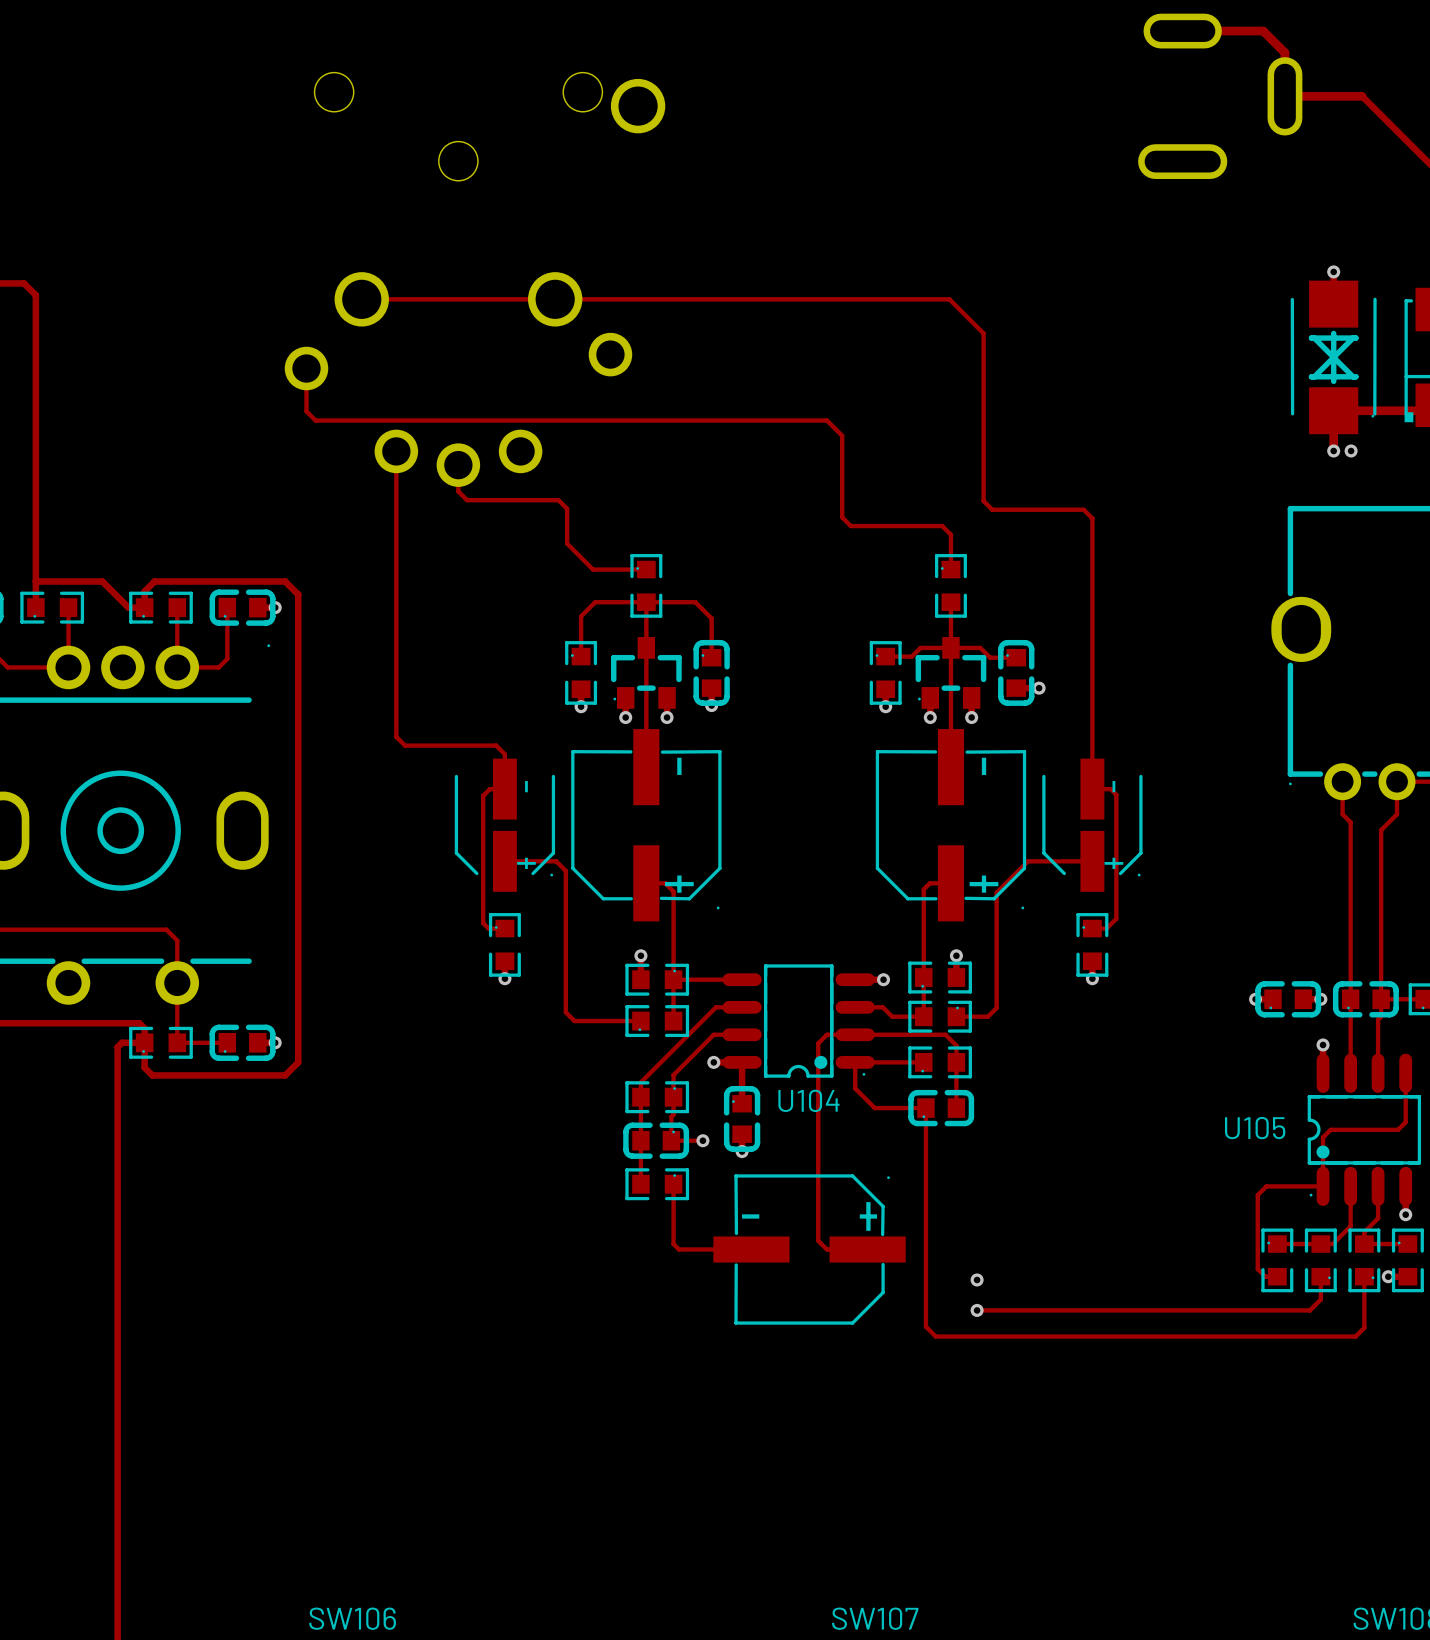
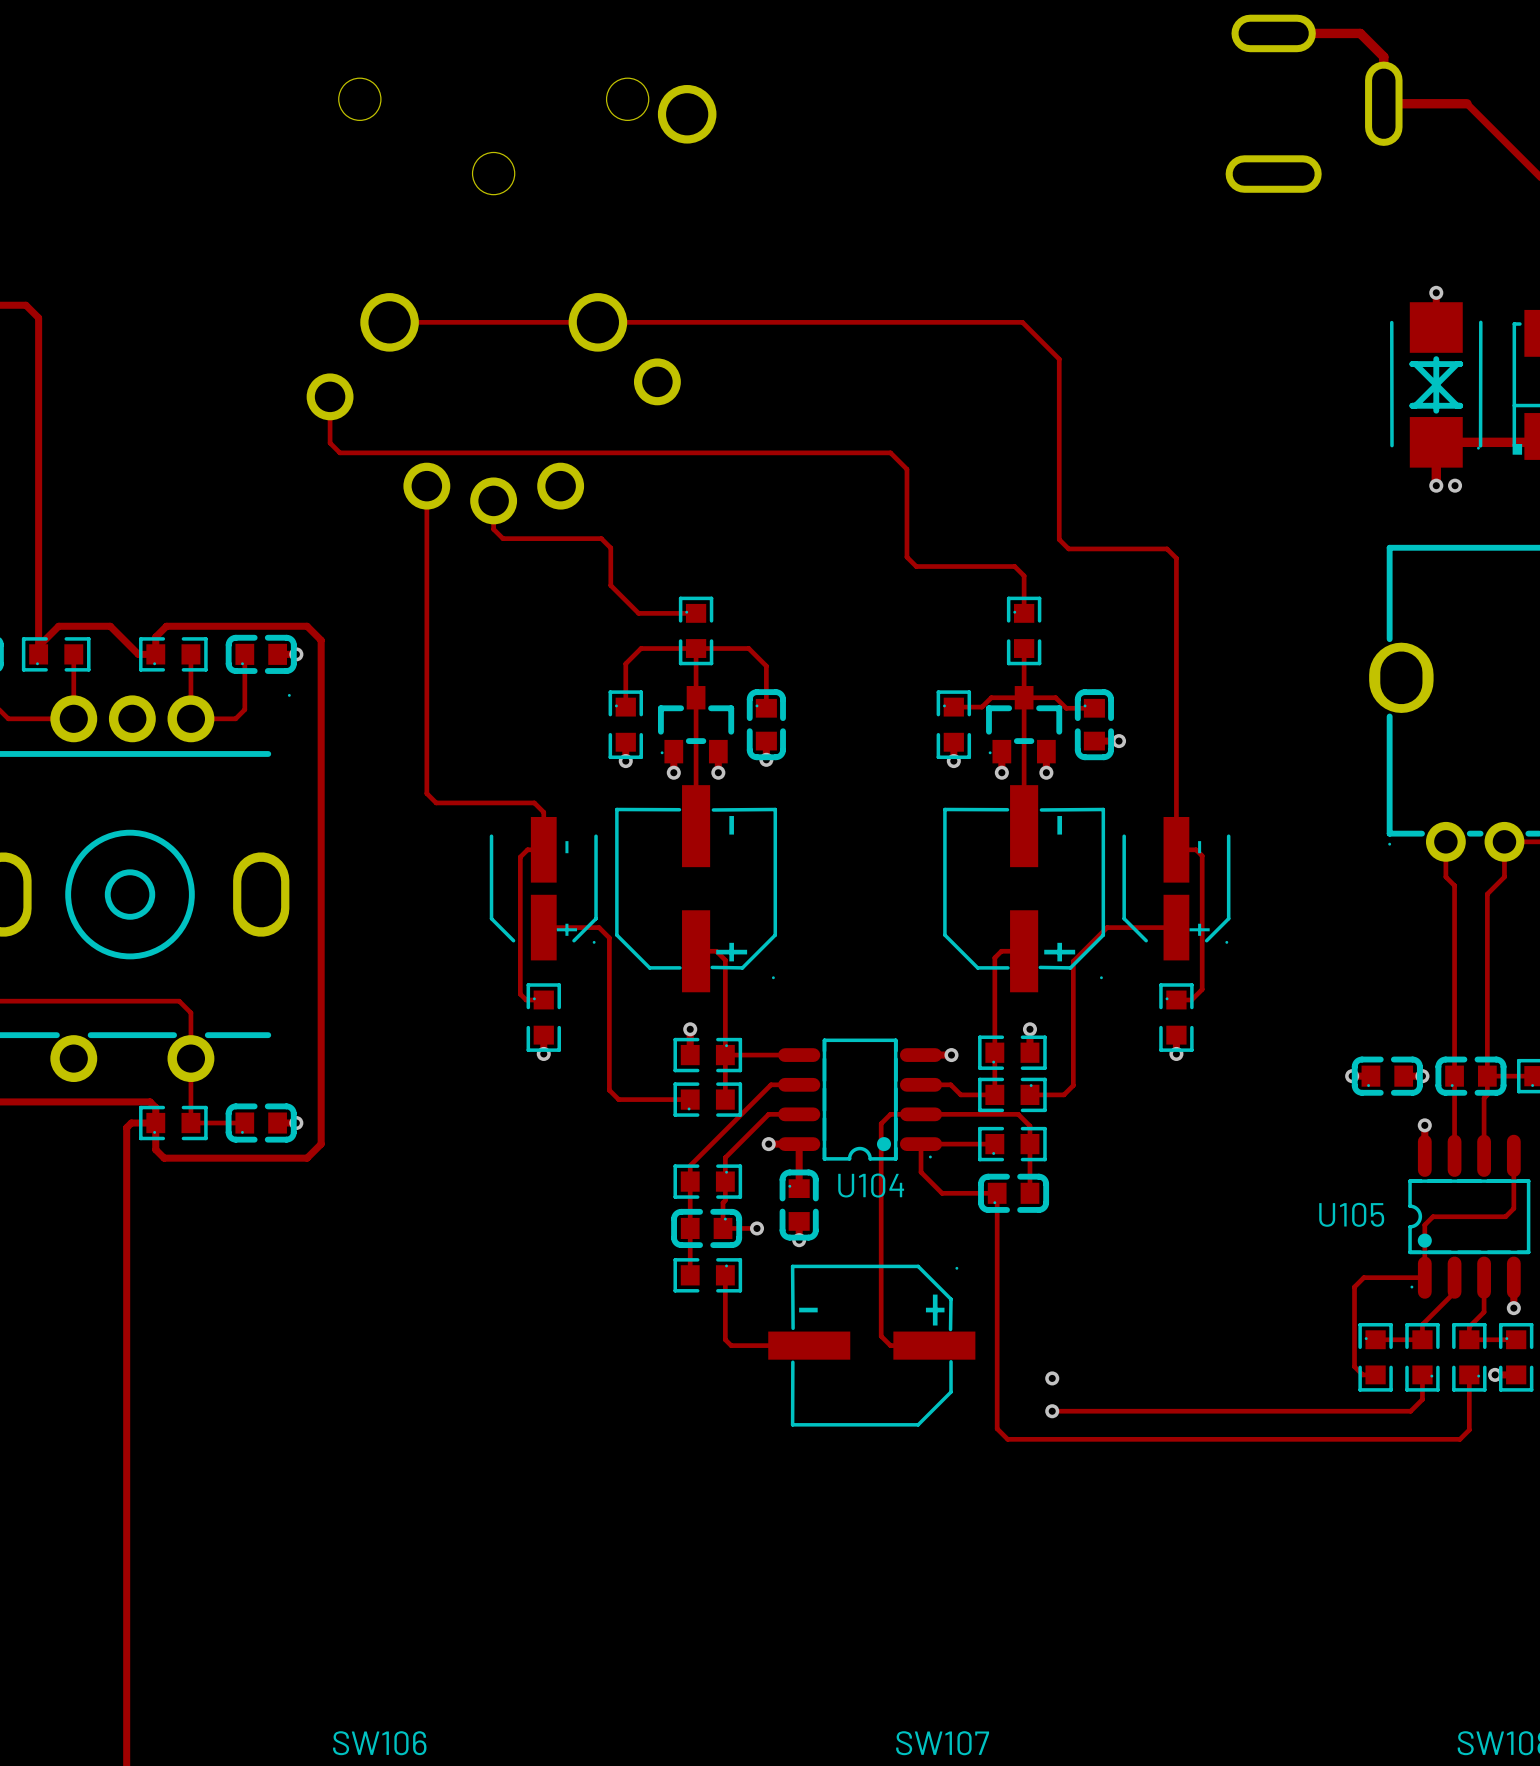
track: (35, 581) (54, 581) -> (38, 646) (58, 626)
track: (1350, 1200) (1350, 1226) (1332, 1244) (1320, 1244) -> (1454, 1292) (1422, 1324) (1422, 1339)

